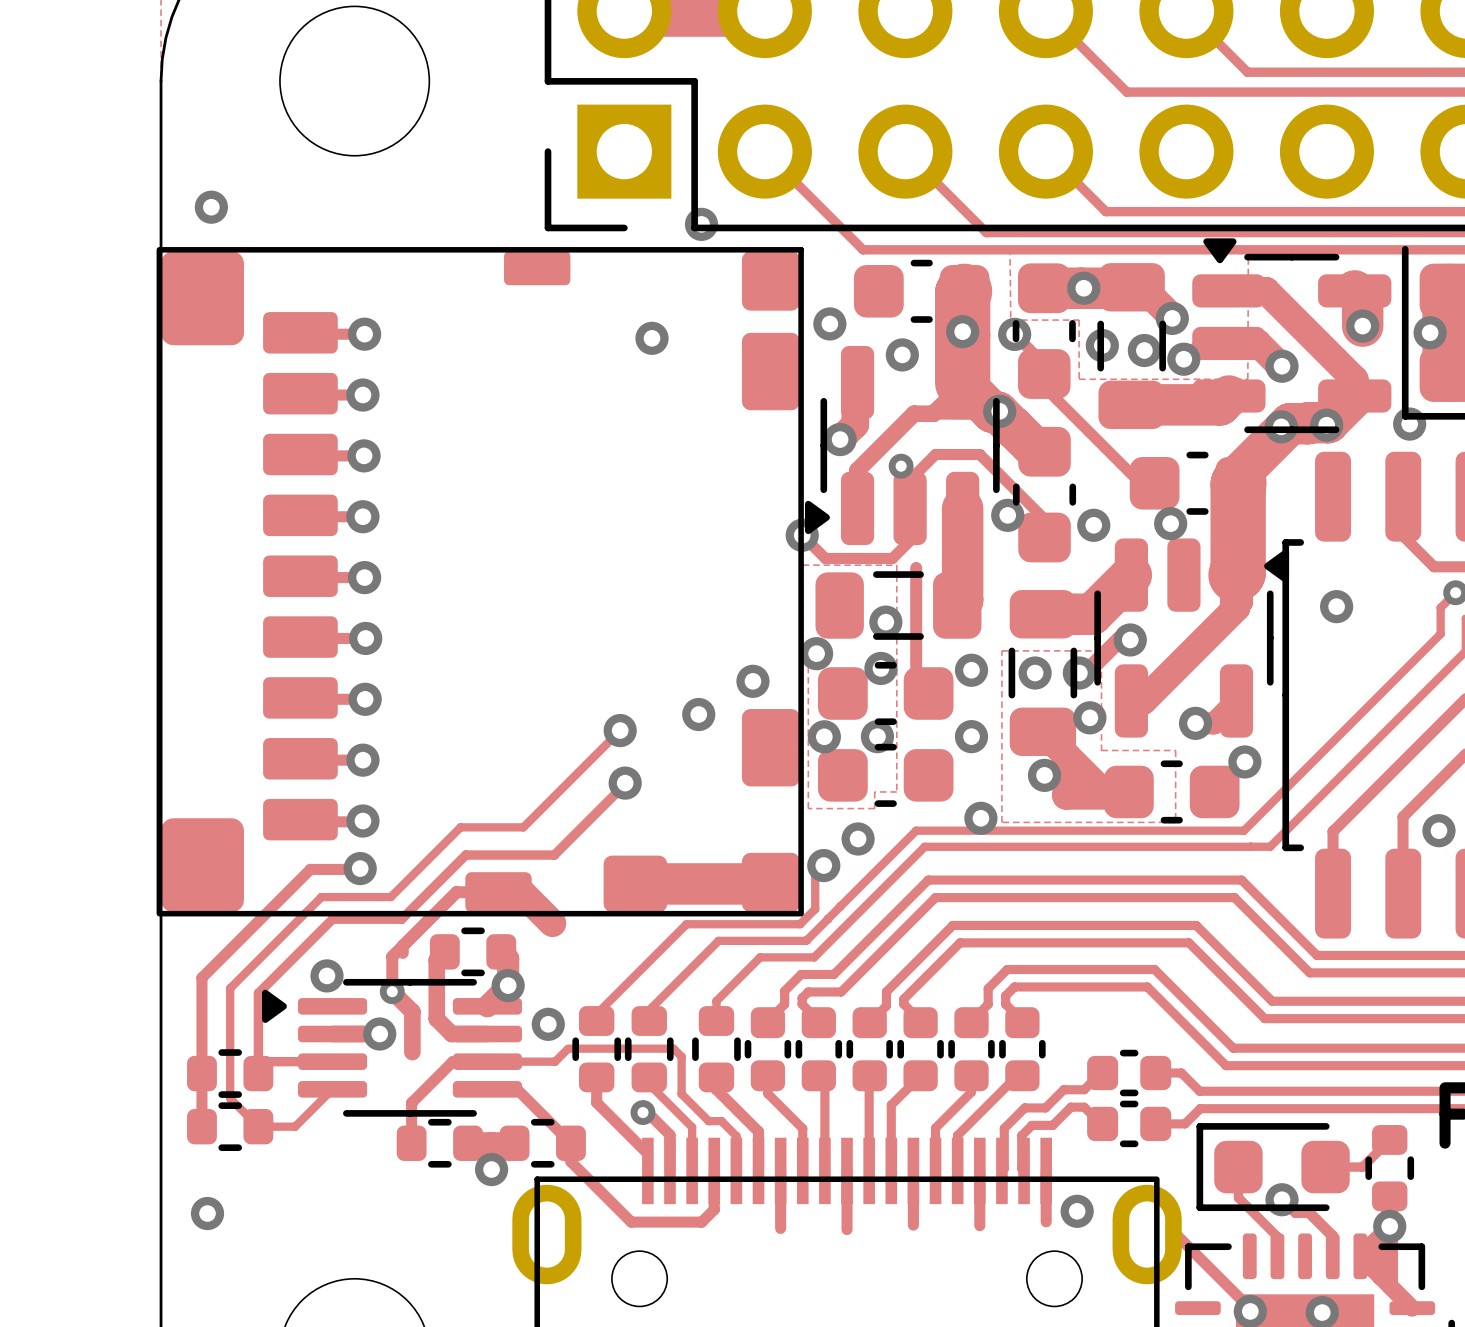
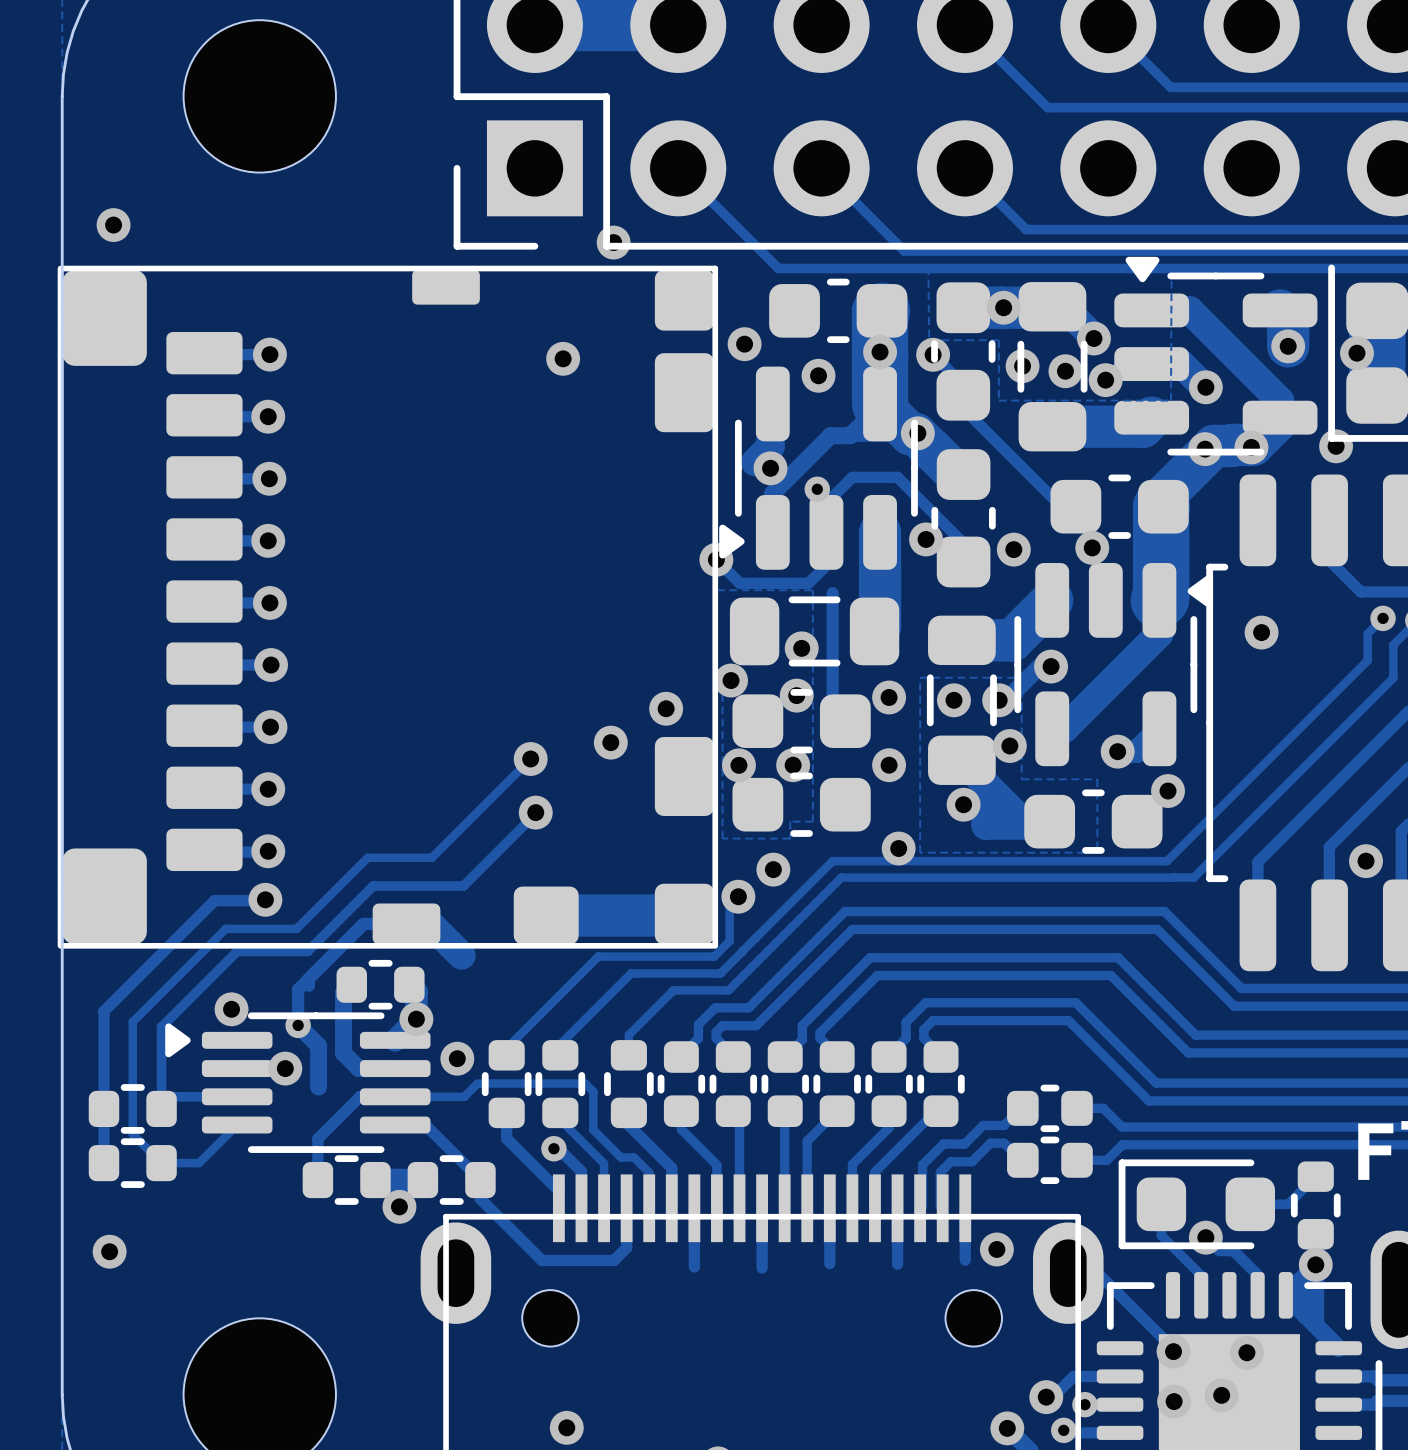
via position: (840, 439) -> (770, 468)

